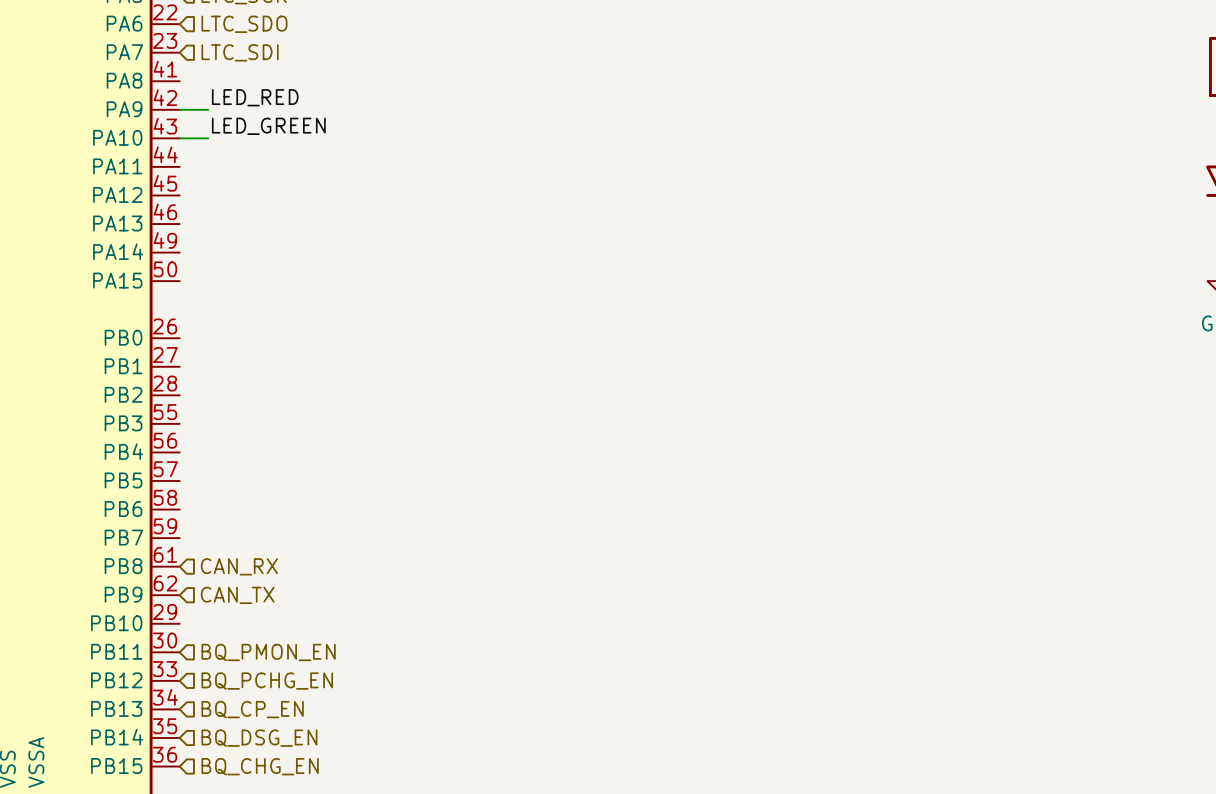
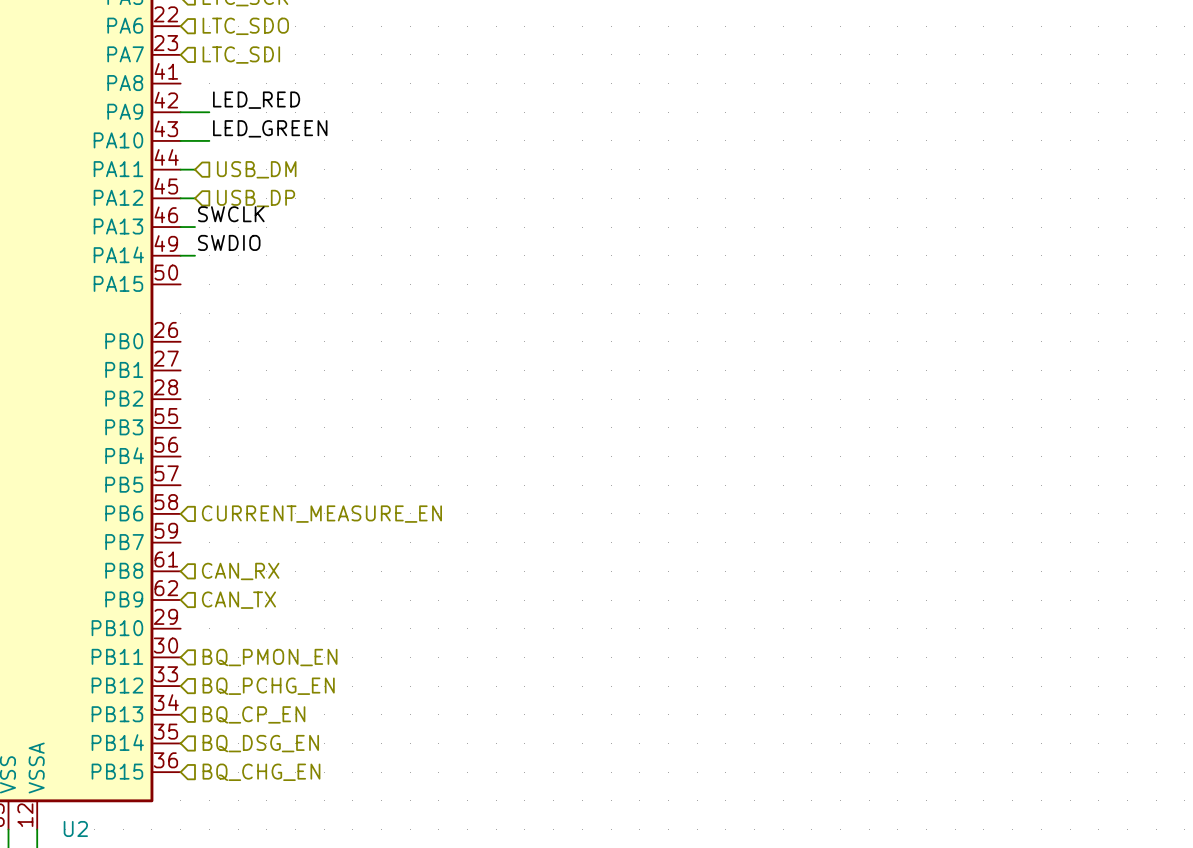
wire: none -> (180, 169) (194, 169)
hierarchical label: none -> USB_DM (256, 169)
wire: none -> (180, 198) (194, 198)
hierarchical label: none -> USB_DP (256, 198)
label: none -> SWCLK (231, 214)
wire: none -> (180, 227) (194, 227)
label: none -> SWDIO (229, 242)
wire: none -> (180, 255) (194, 255)
hierarchical label: none -> CURRENT_MEASURE_EN (321, 514)

